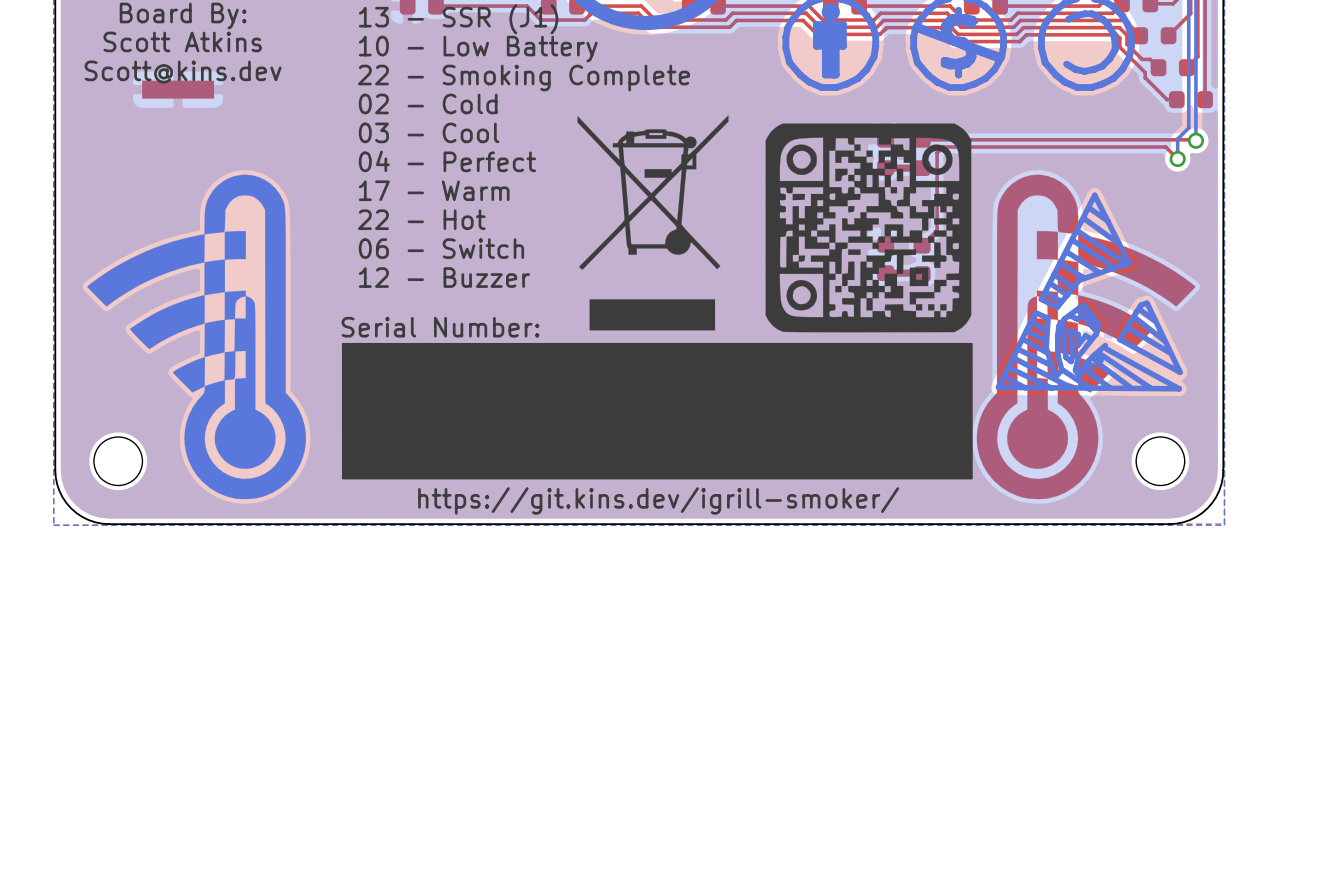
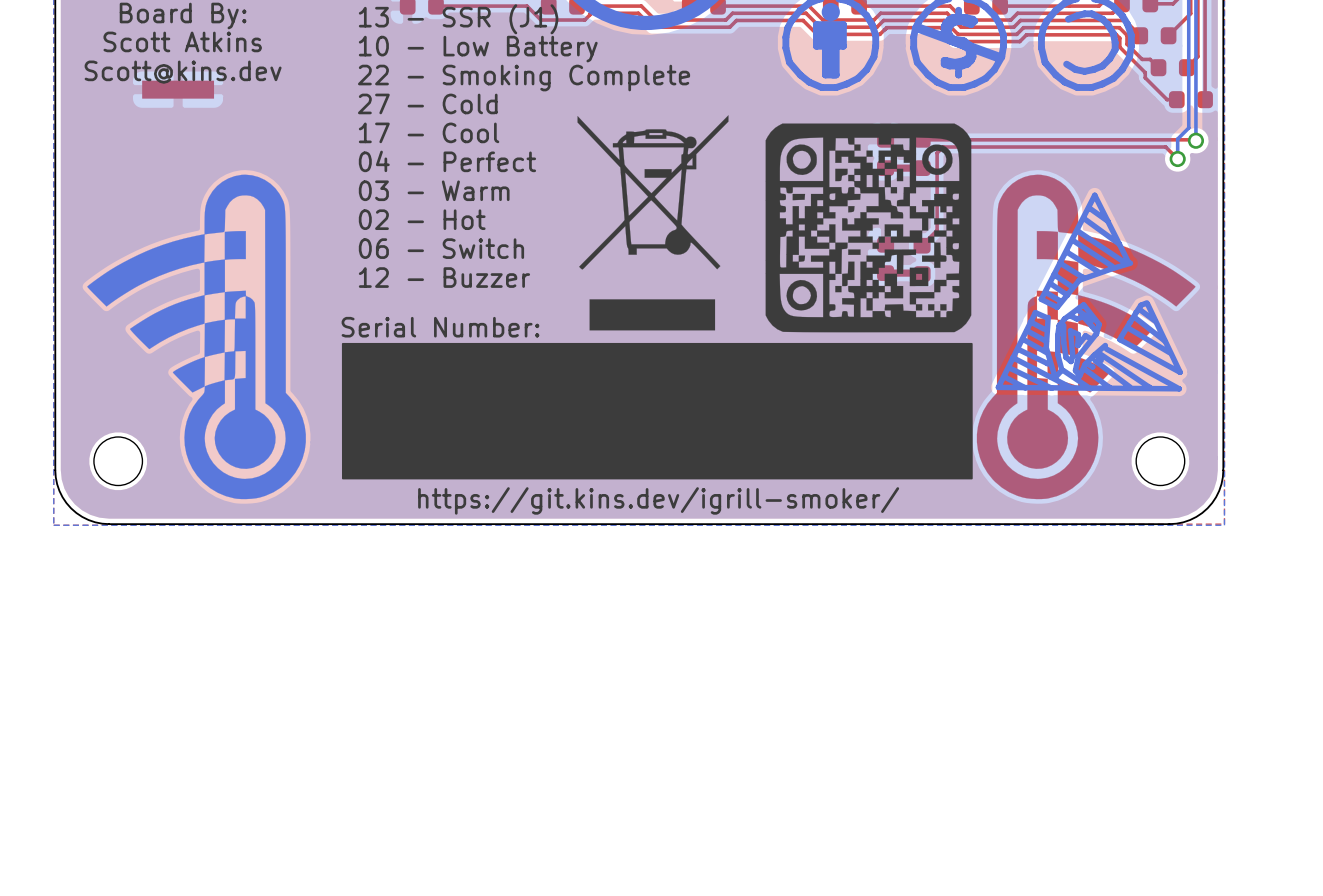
text: 02 - Cold (428, 103) -> 27 - Cold (427, 103)
text: 03 - Cool (429, 132) -> 17 - Cool (429, 132)
text: 17 - Warm (434, 190) -> 03 - Warm (434, 190)
text: 22 - Hot (421, 219) -> 02 - Hot (422, 219)

